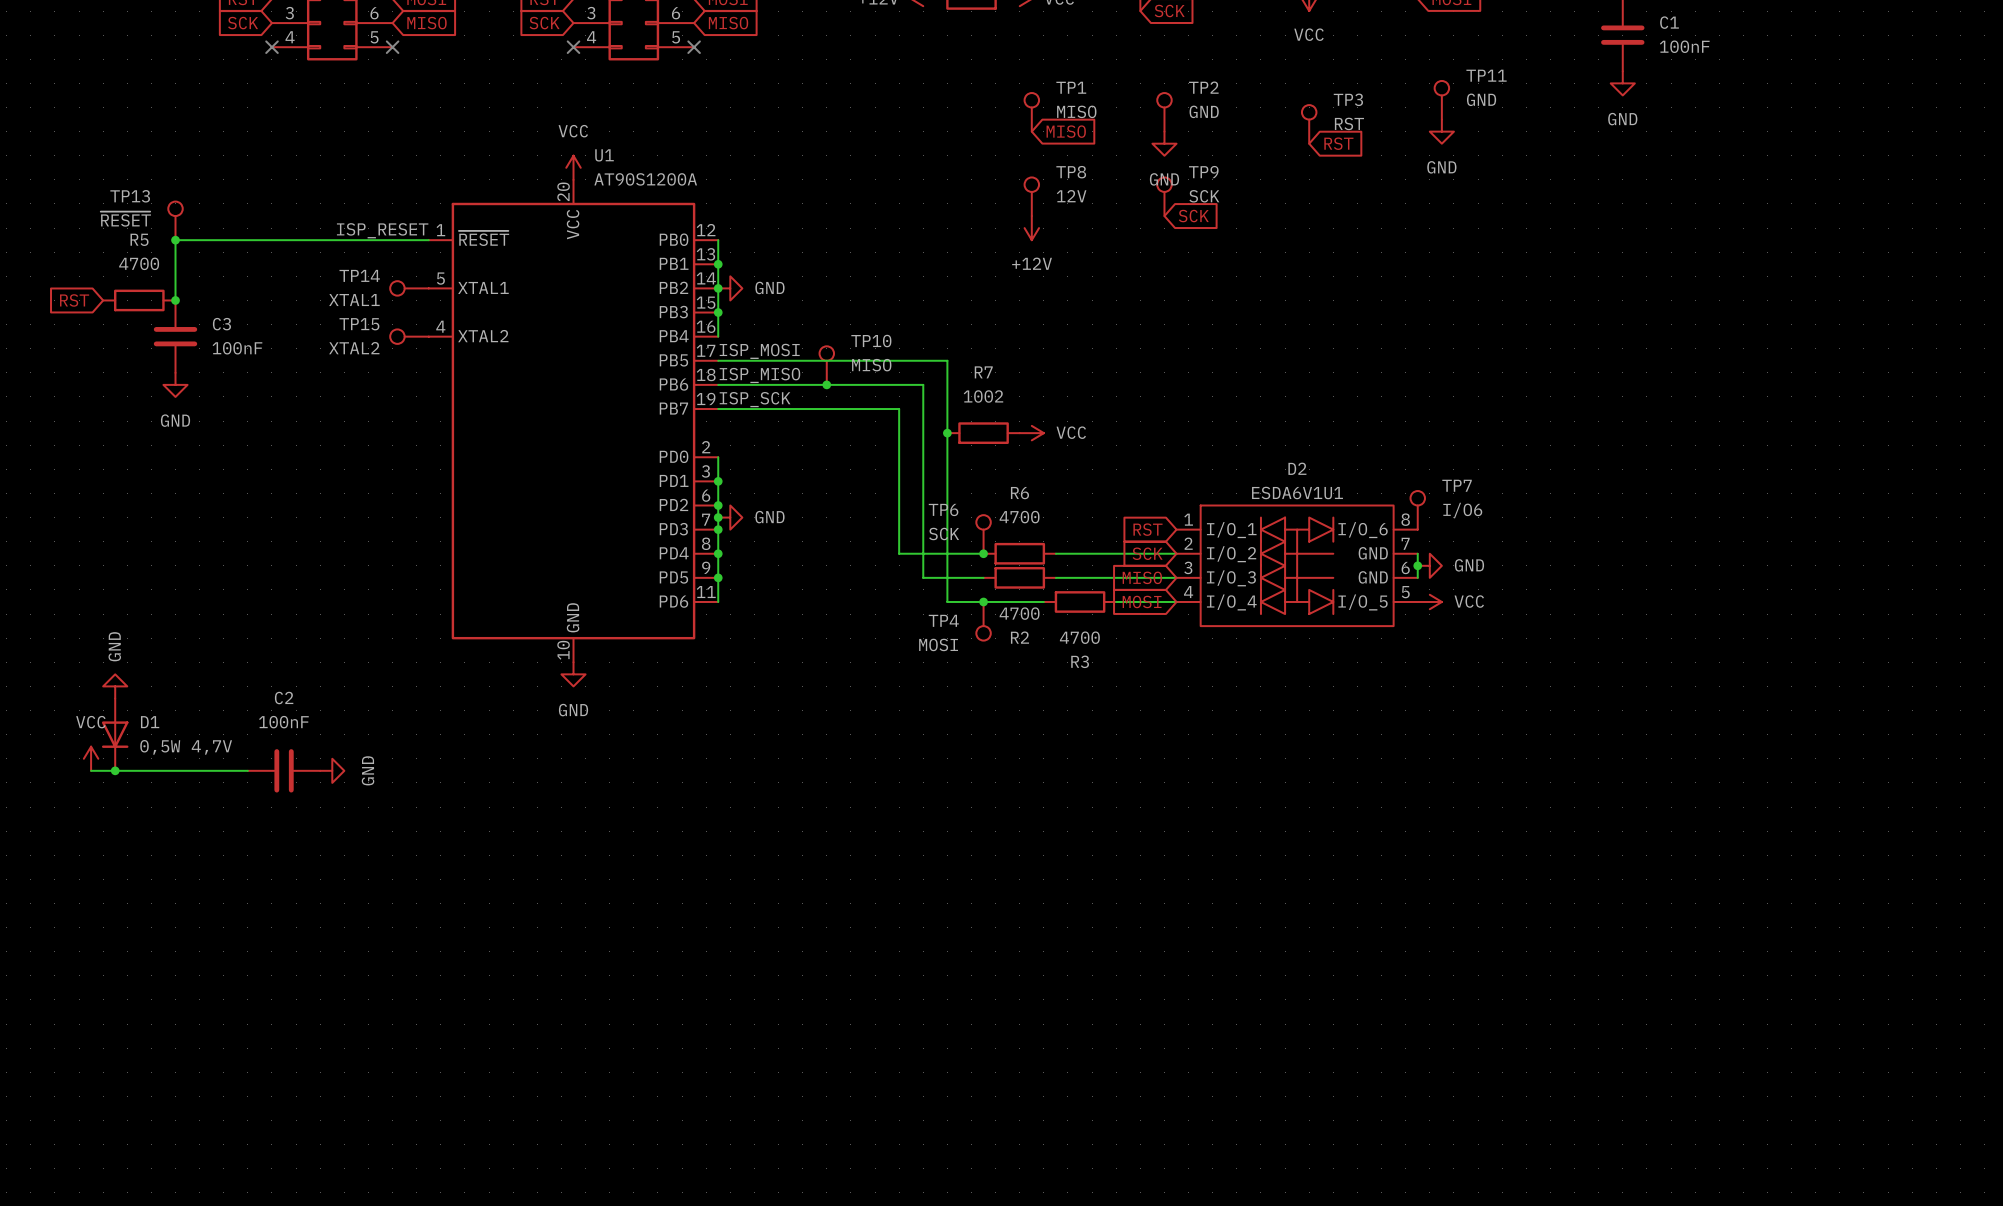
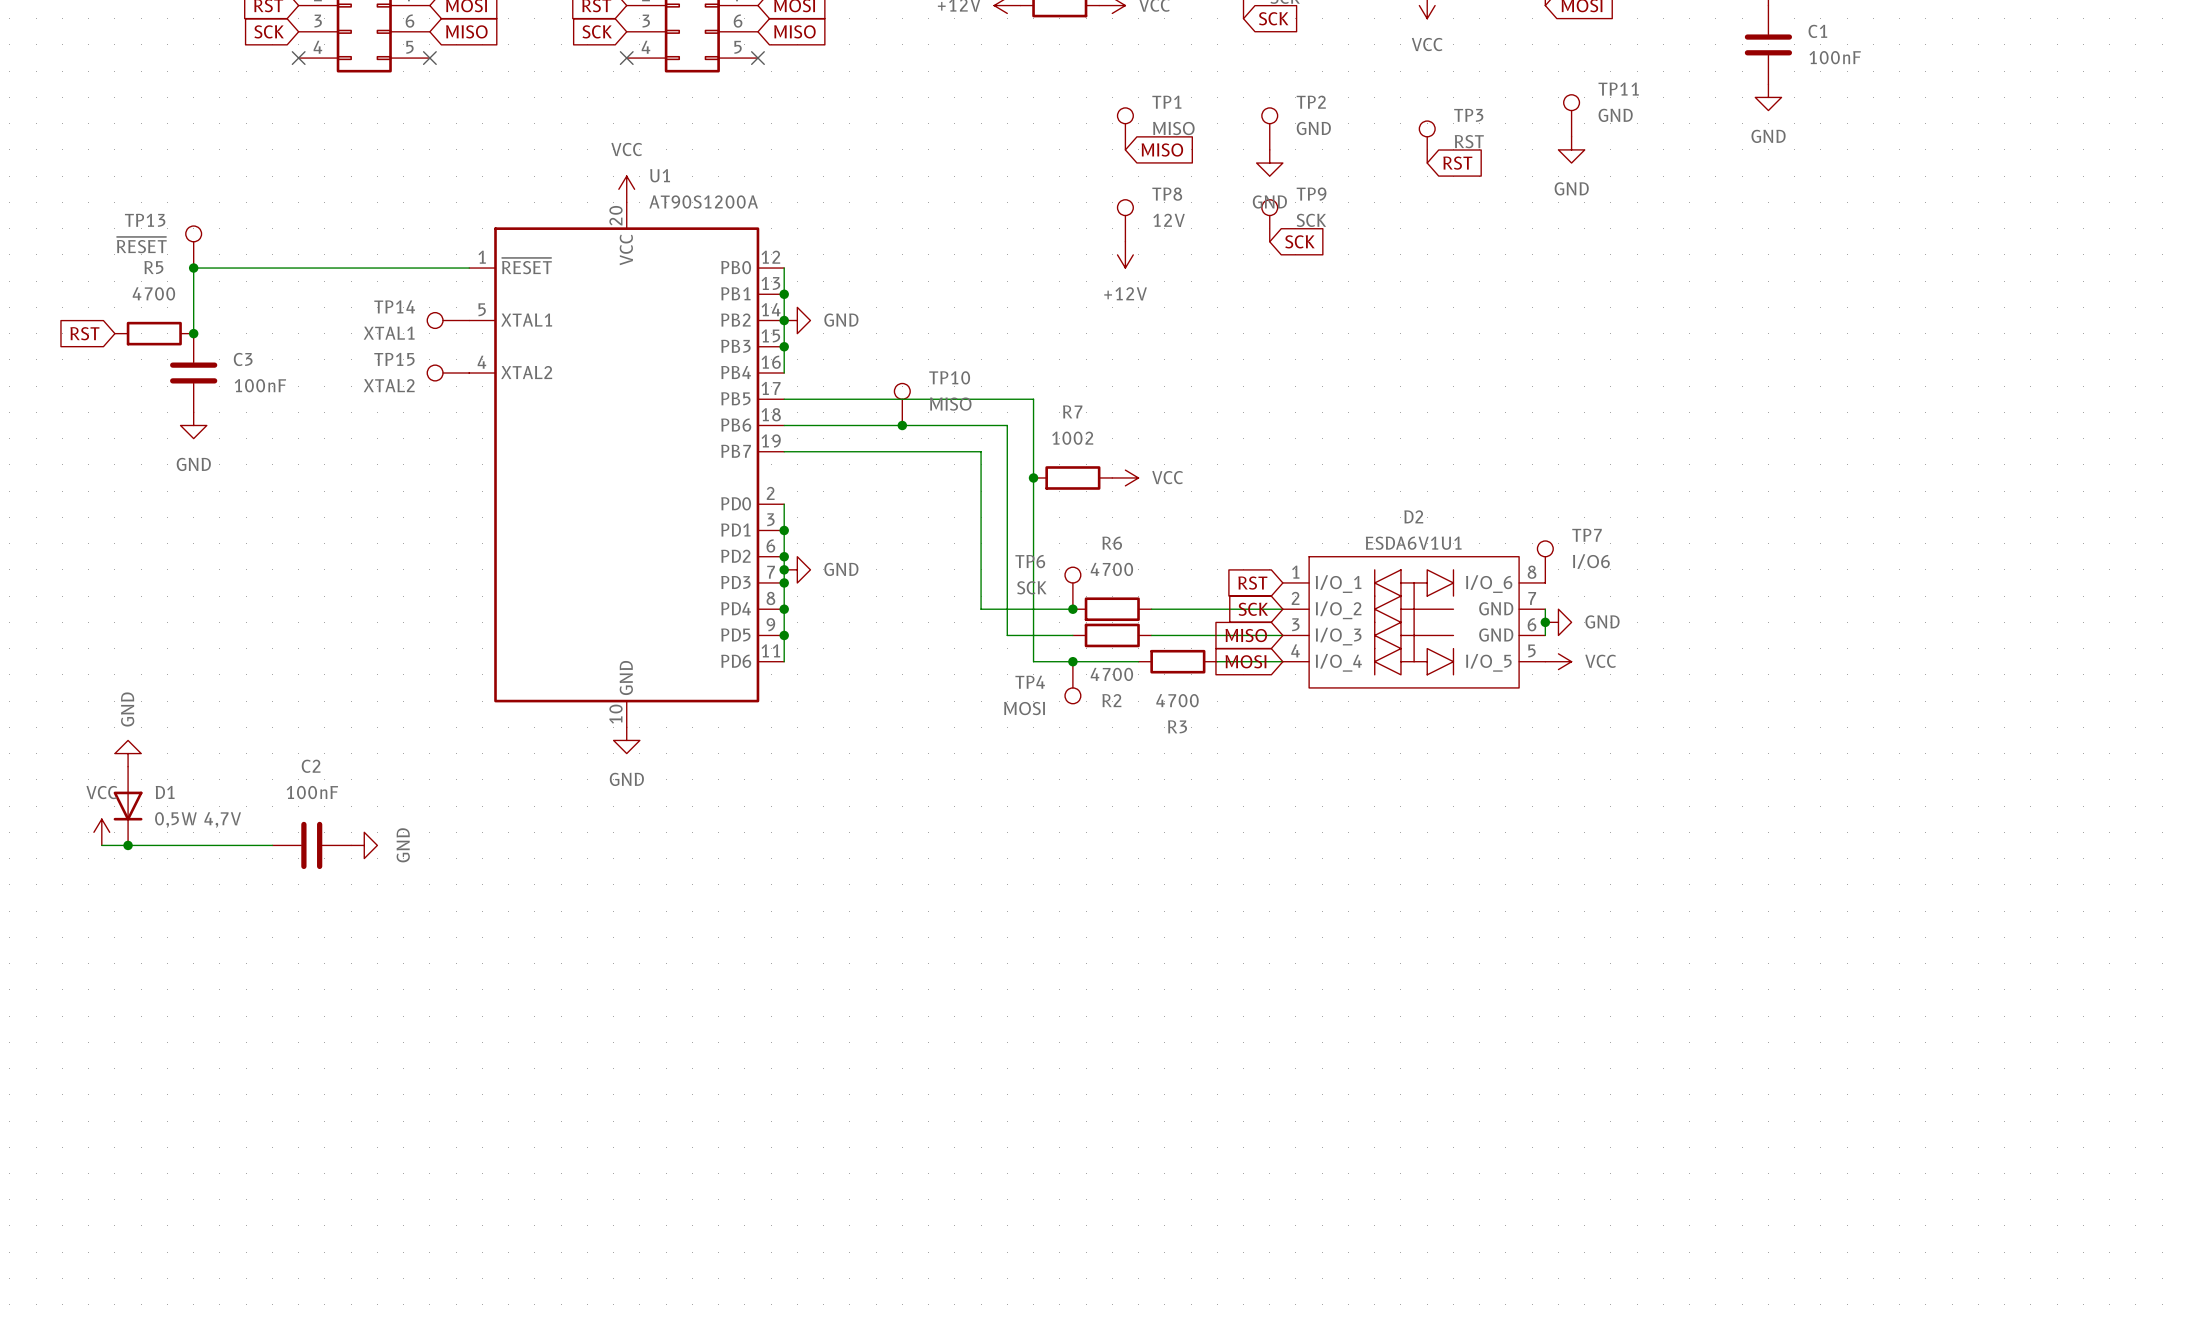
label: ISP_RESET (382, 230) -> none
label: ISP_MOSI (759, 351) -> none
label: ISP_MISO (759, 375) -> none
label: ISP_SCK (755, 399) -> none

